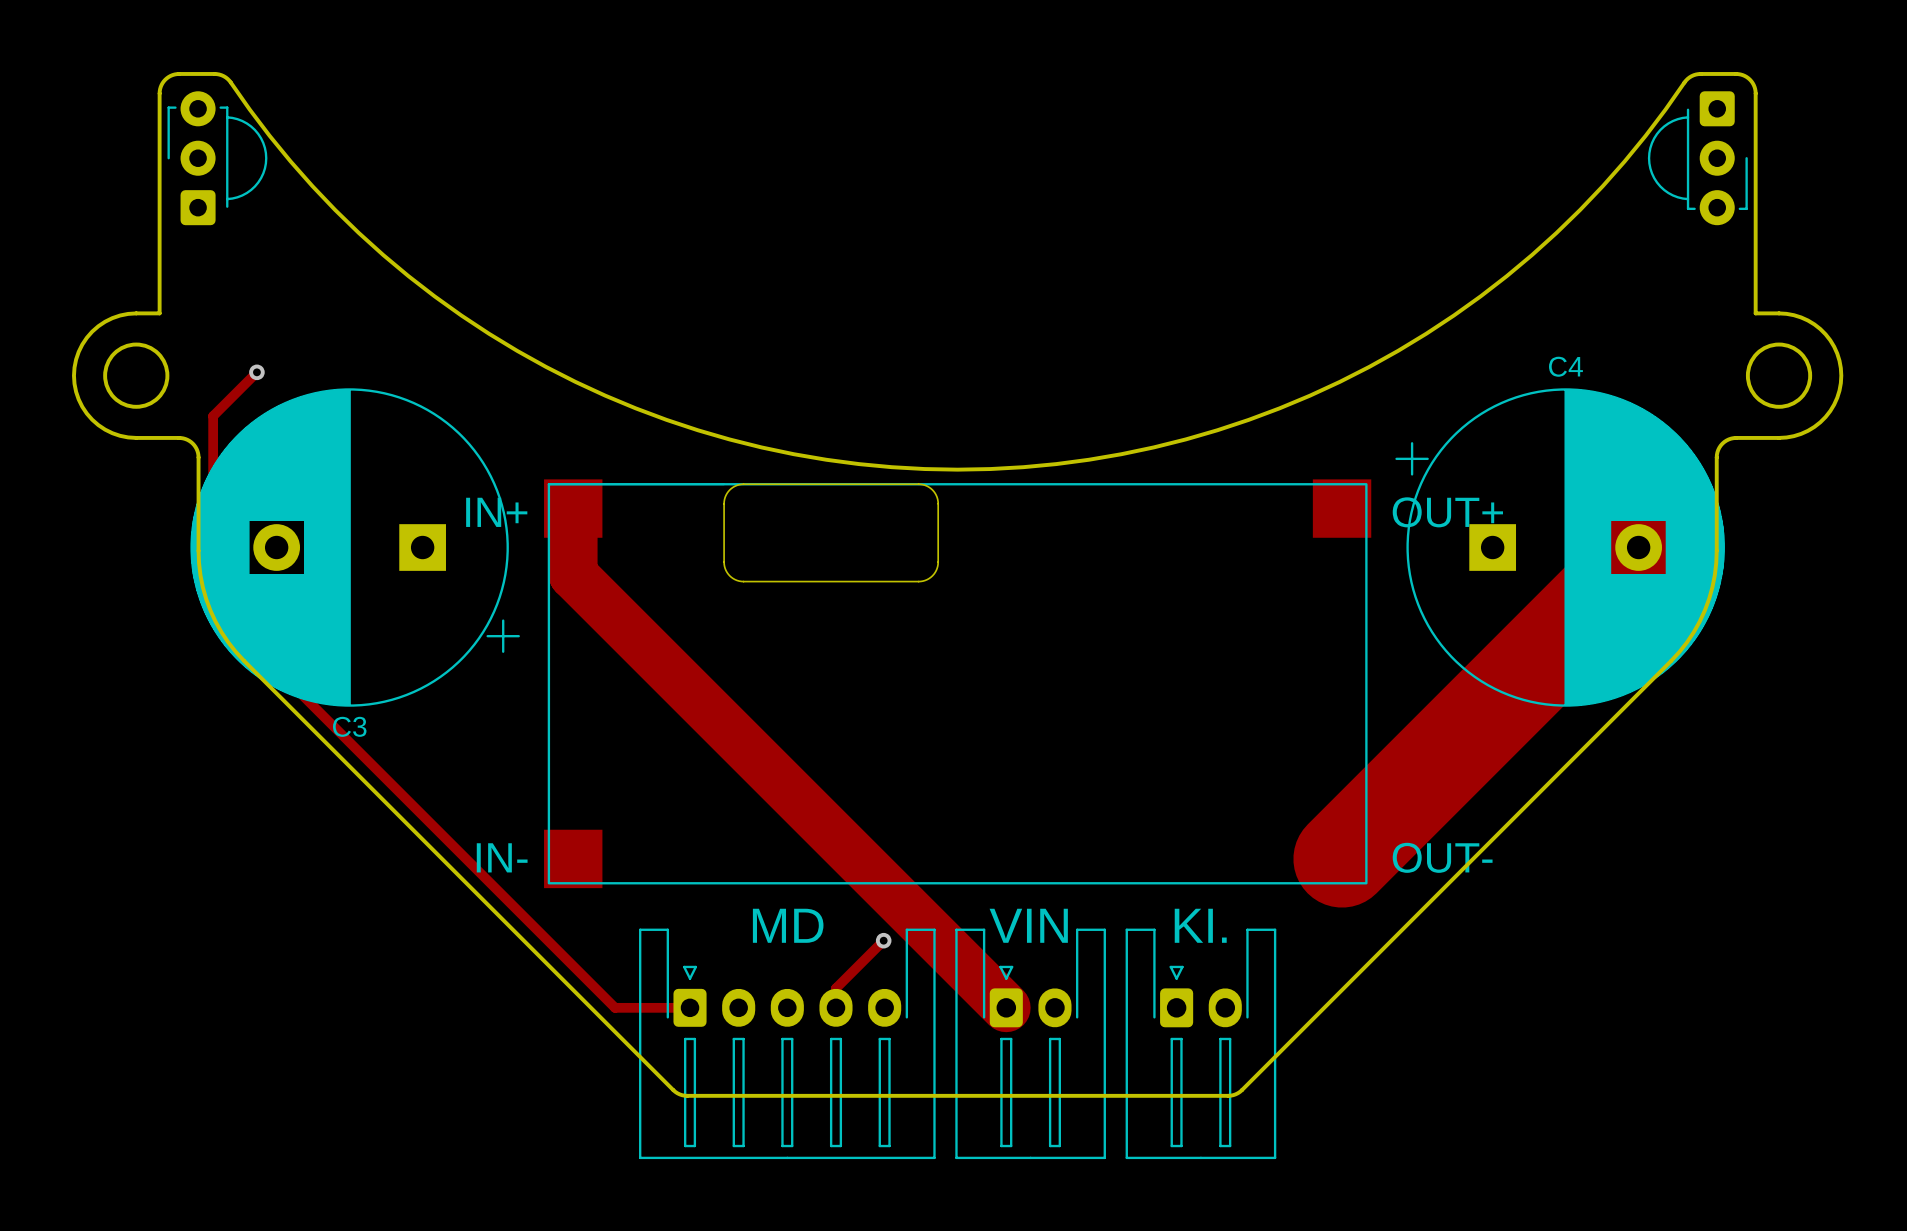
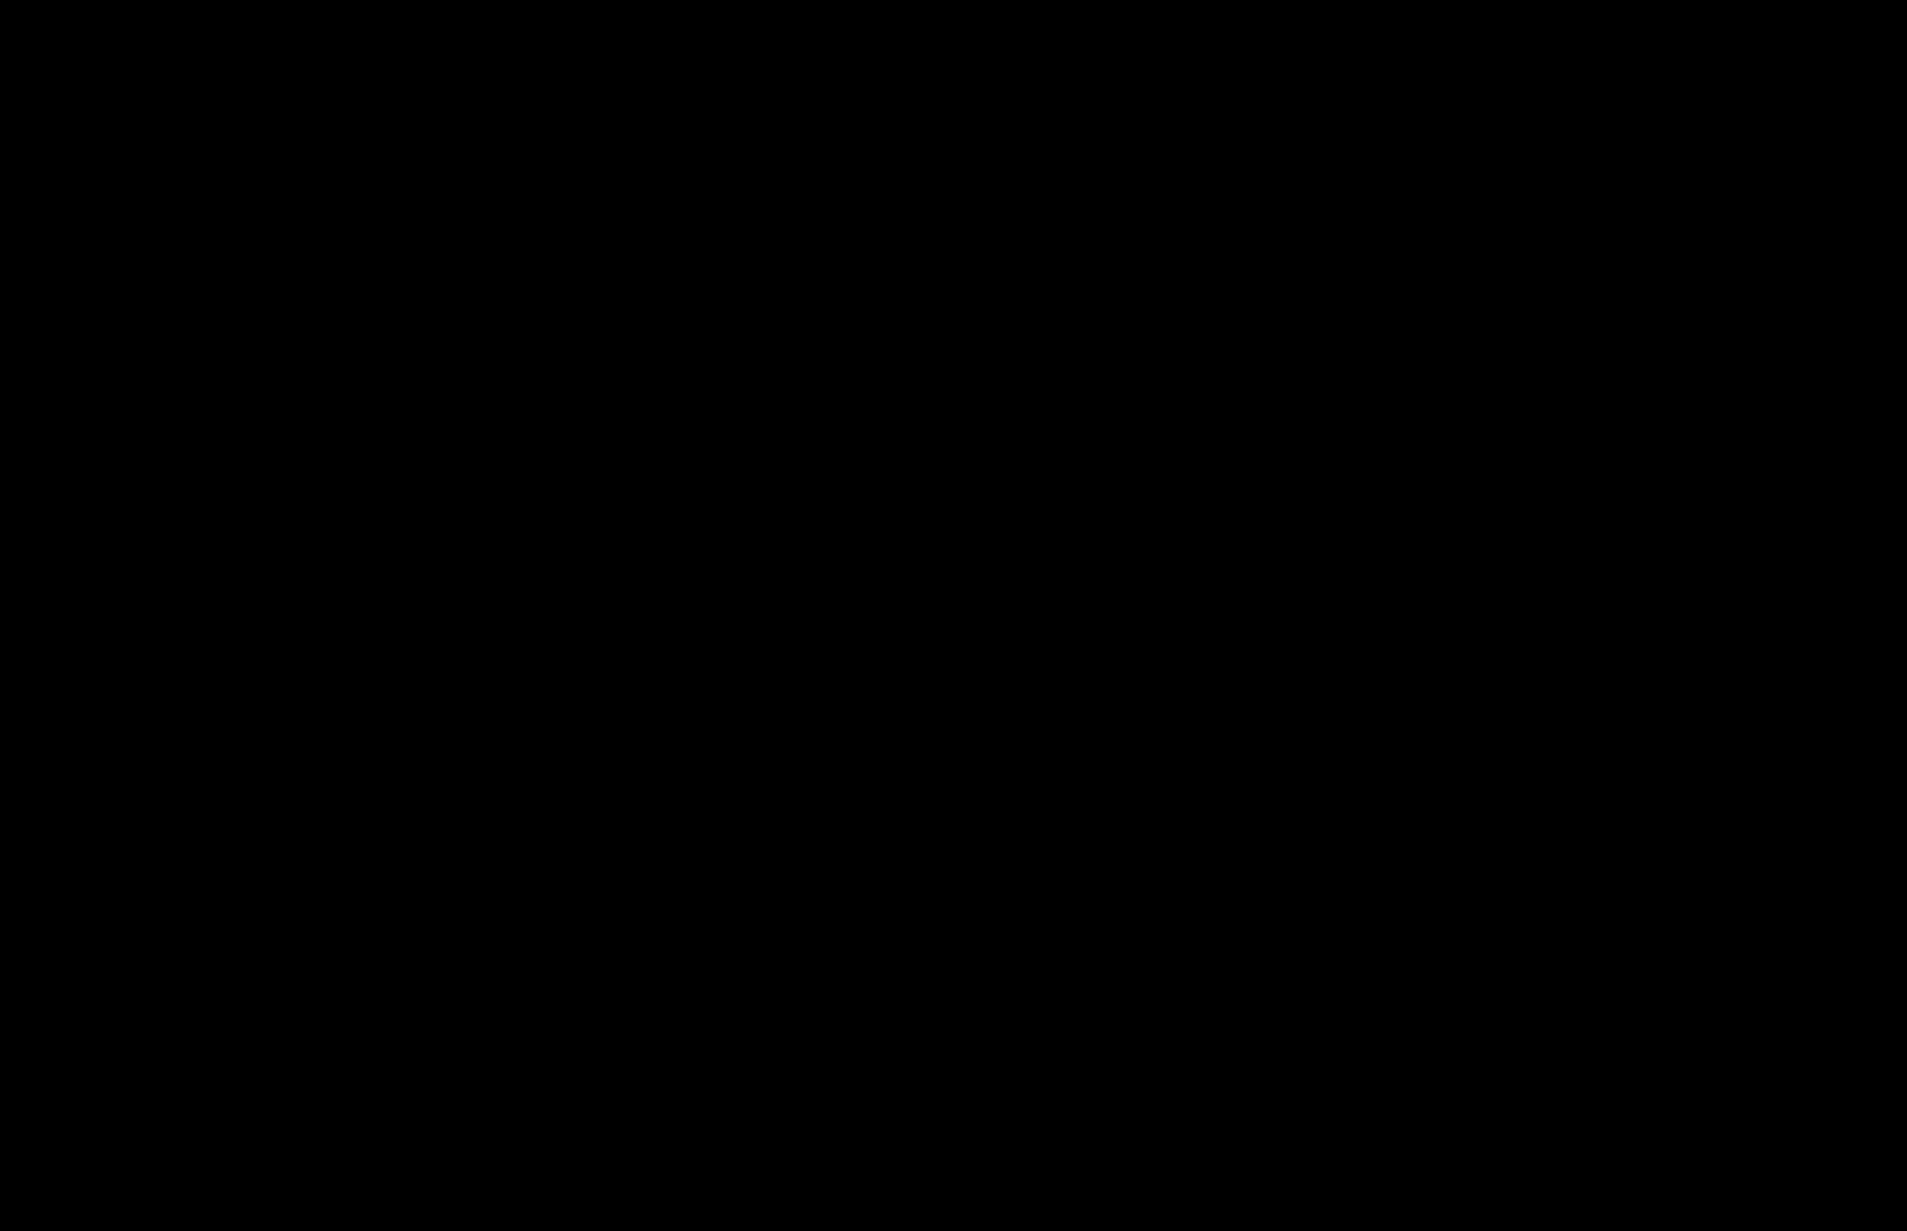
board edge: (179, 73) (217, 74) (225, 77) (269, 135) (312, 186) (383, 255) (461, 315) (517, 350) (575, 381) (666, 419) (761, 447) (858, 464) (957, 469) (1056, 464) (1153, 447) (1248, 419) (1339, 381) (1426, 333) (1480, 296) (1532, 255) (1602, 186) (1645, 135) (1689, 77) (1698, 74) (1740, 74) (1751, 81) (1755, 91) (1755, 313) (1793, 315) (1807, 320) (1820, 329) (1830, 340) (1837, 353) (1841, 375) (1839, 390) (1834, 404) (1825, 416) (1807, 430) (1786, 437) (1733, 438) (1720, 445) (1716, 457) (1716, 550) (1714, 575) (1704, 610) (1687, 642) (1671, 660) (1237, 1093) (1228, 1095) (684, 1095) (673, 1090) (244, 660) (228, 642) (210, 610) (200, 575) (198, 550) (198, 457) (194, 445) (181, 438) (128, 437) (112, 433) (98, 425) (82, 406) (76, 391) (73, 375) (78, 351) (86, 337) (98, 326) (120, 315) (159, 313) (159, 91) (166, 78) (179, 73) -> none
part: (217, 158) -> none
part: (1697, 158) -> none
round board edge: [103, 342, 170, 409] -> none
round board edge: [1745, 342, 1813, 409] -> none
track: (256, 372) (213, 416) (213, 581) (227, 596) (227, 620) (615, 1007) (690, 1007) -> none
via: (256, 372) -> none
track: (573, 508) (573, 574) (1006, 1007) -> none
C3: (355, 547) -> none
C4: (1560, 547) -> none
track: (1638, 547) (1638, 562) (1342, 858) -> none
part: (957, 683) -> none
track: (883, 940) (835, 988) (835, 1007) -> none
via: (883, 940) -> none
MD: (787, 1043) -> none
VIN: (1030, 1043) -> none
KI.: (1200, 1043) -> none

